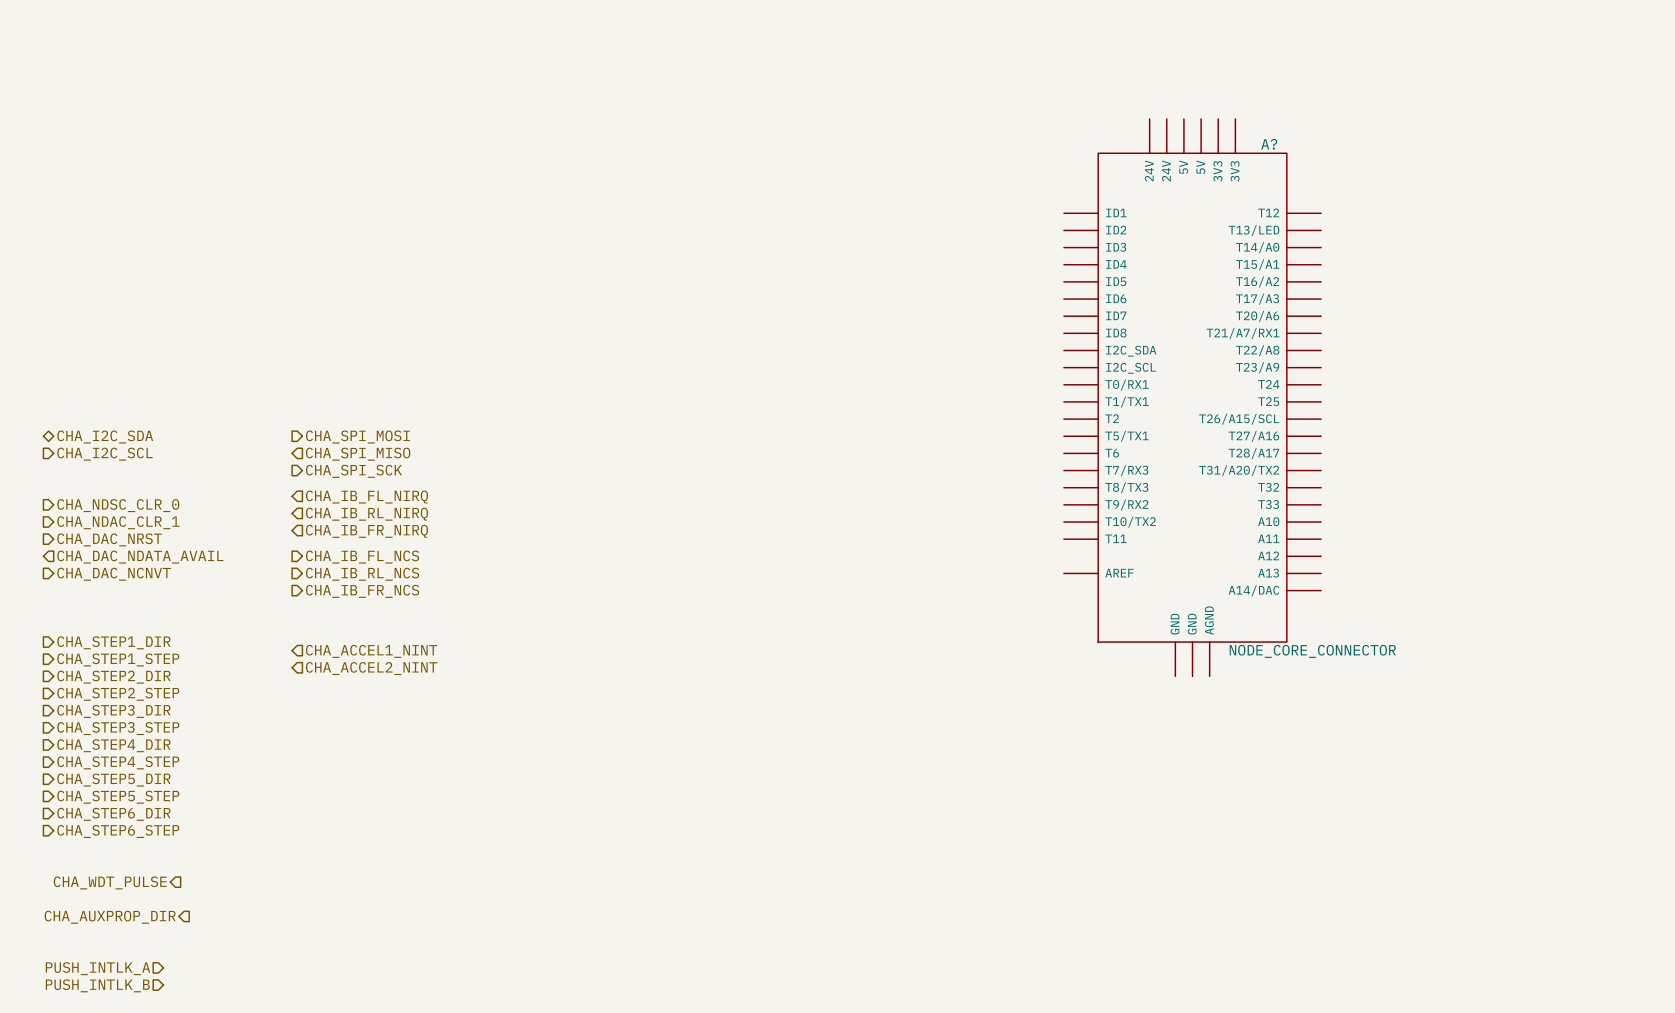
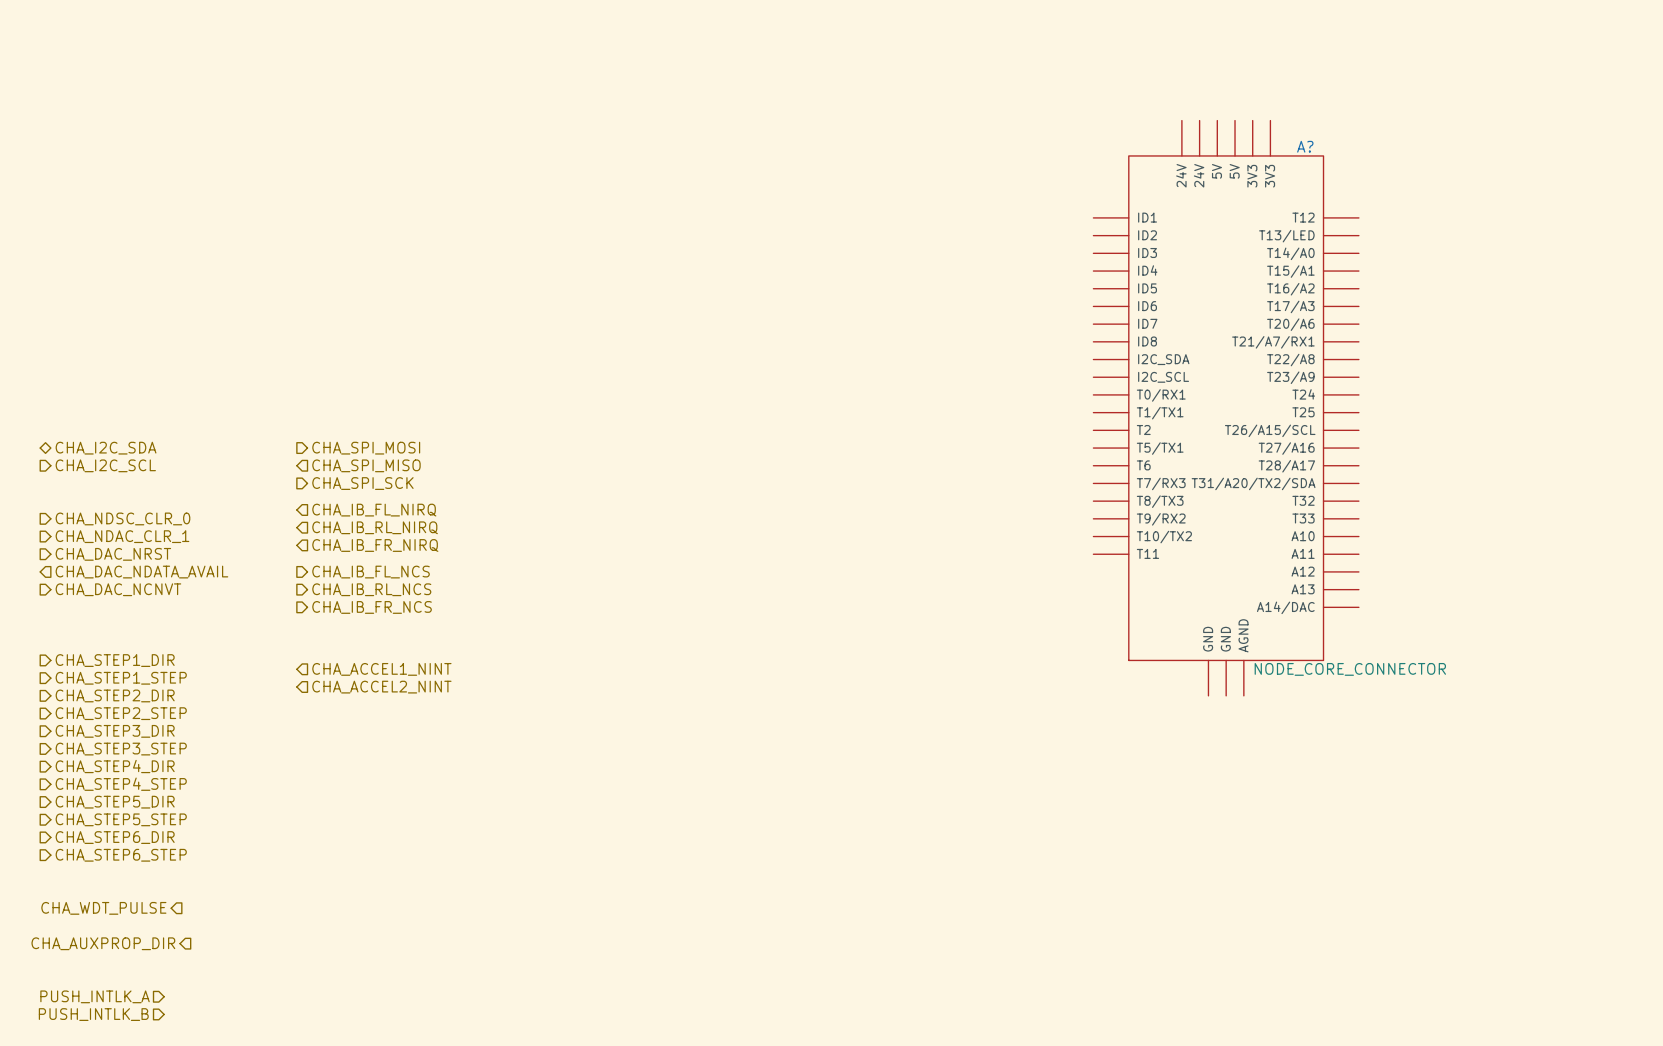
A? symbol: [1063, 118, 1322, 677] -> [1093, 120, 1359, 696]

